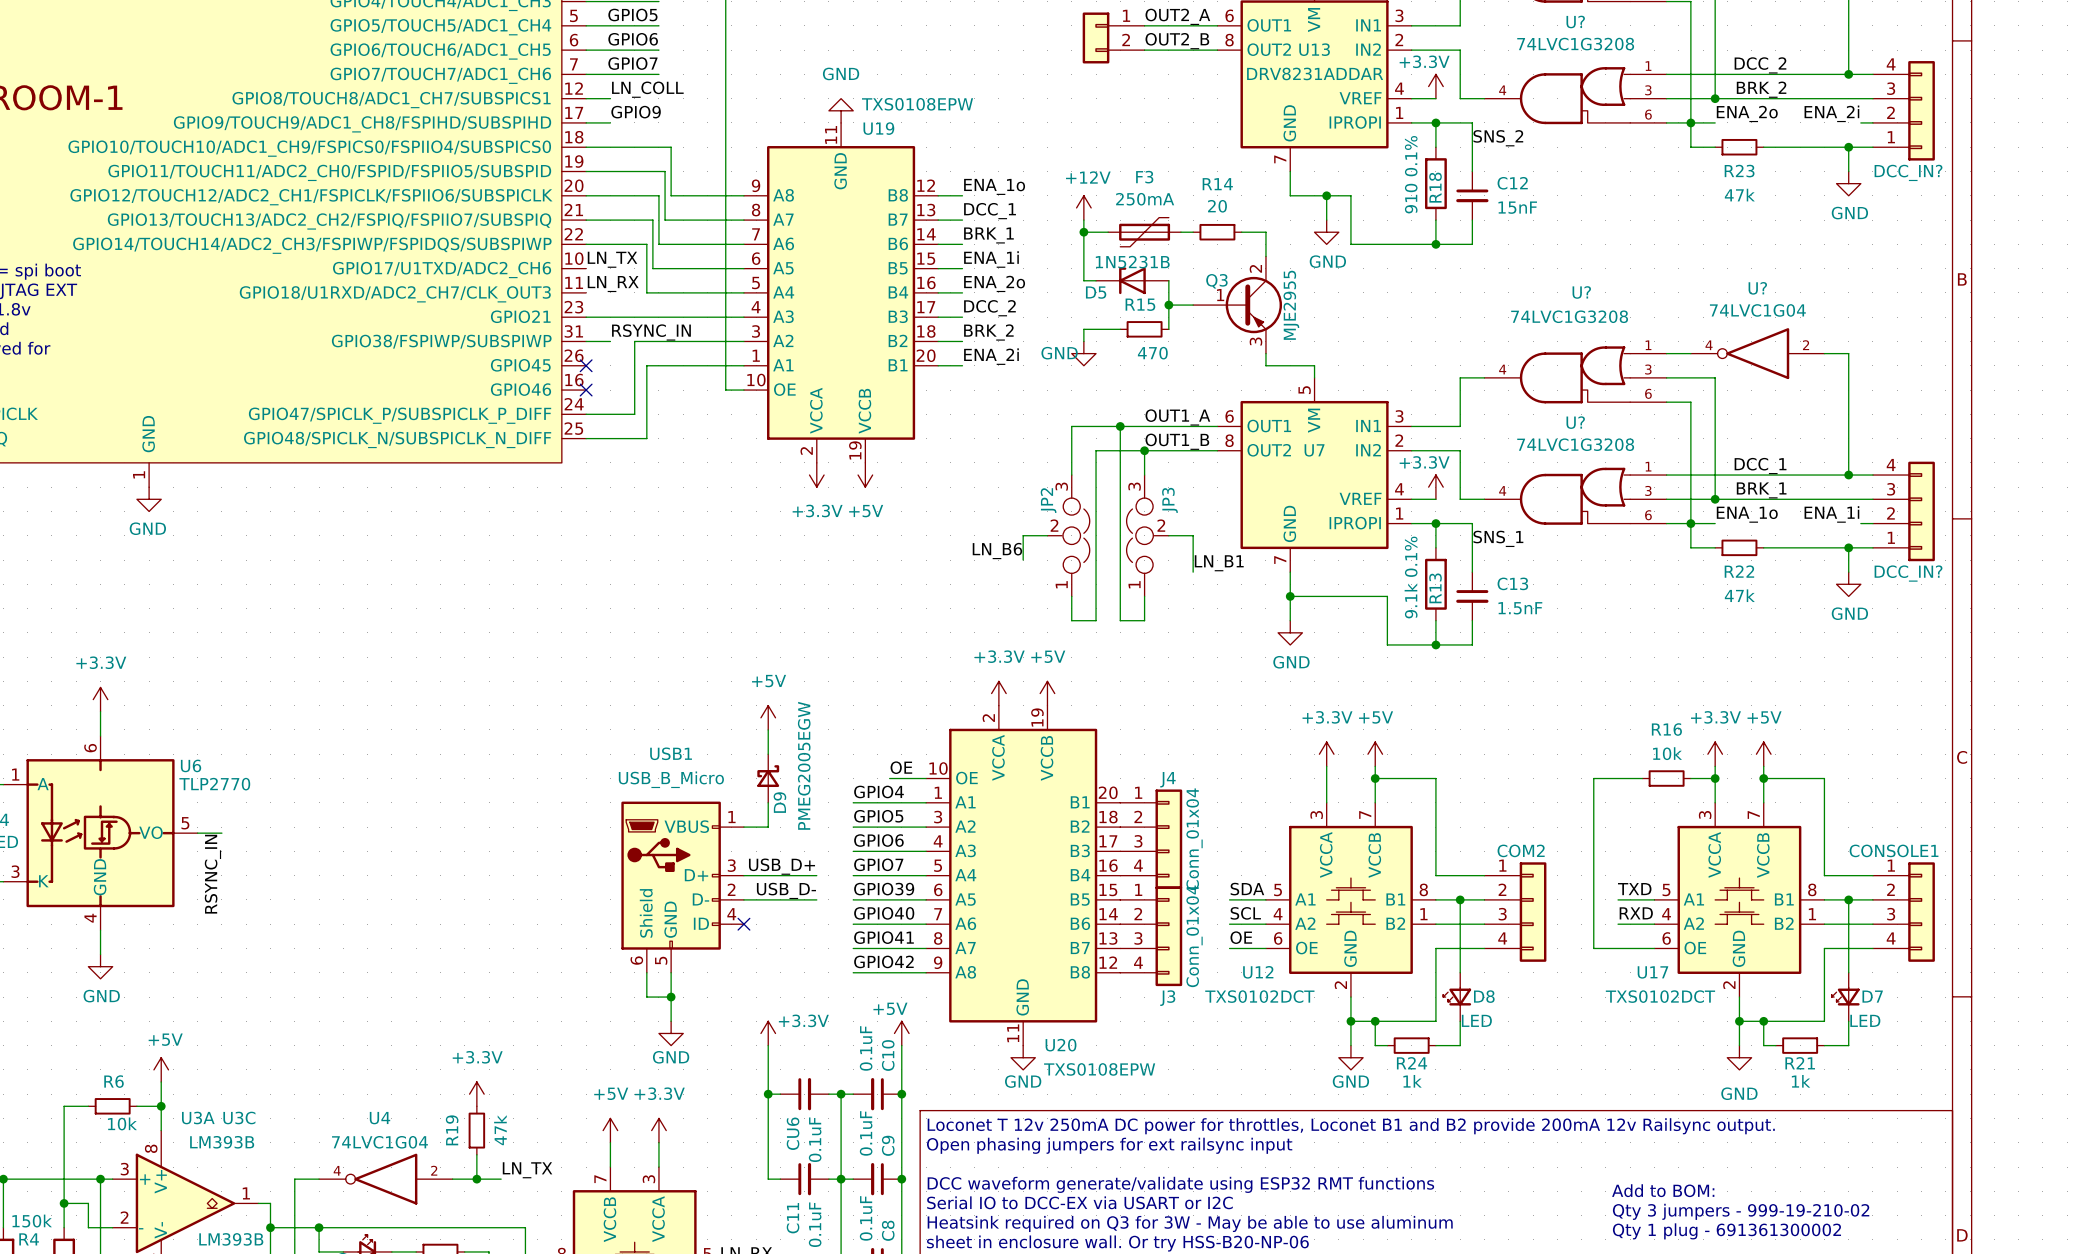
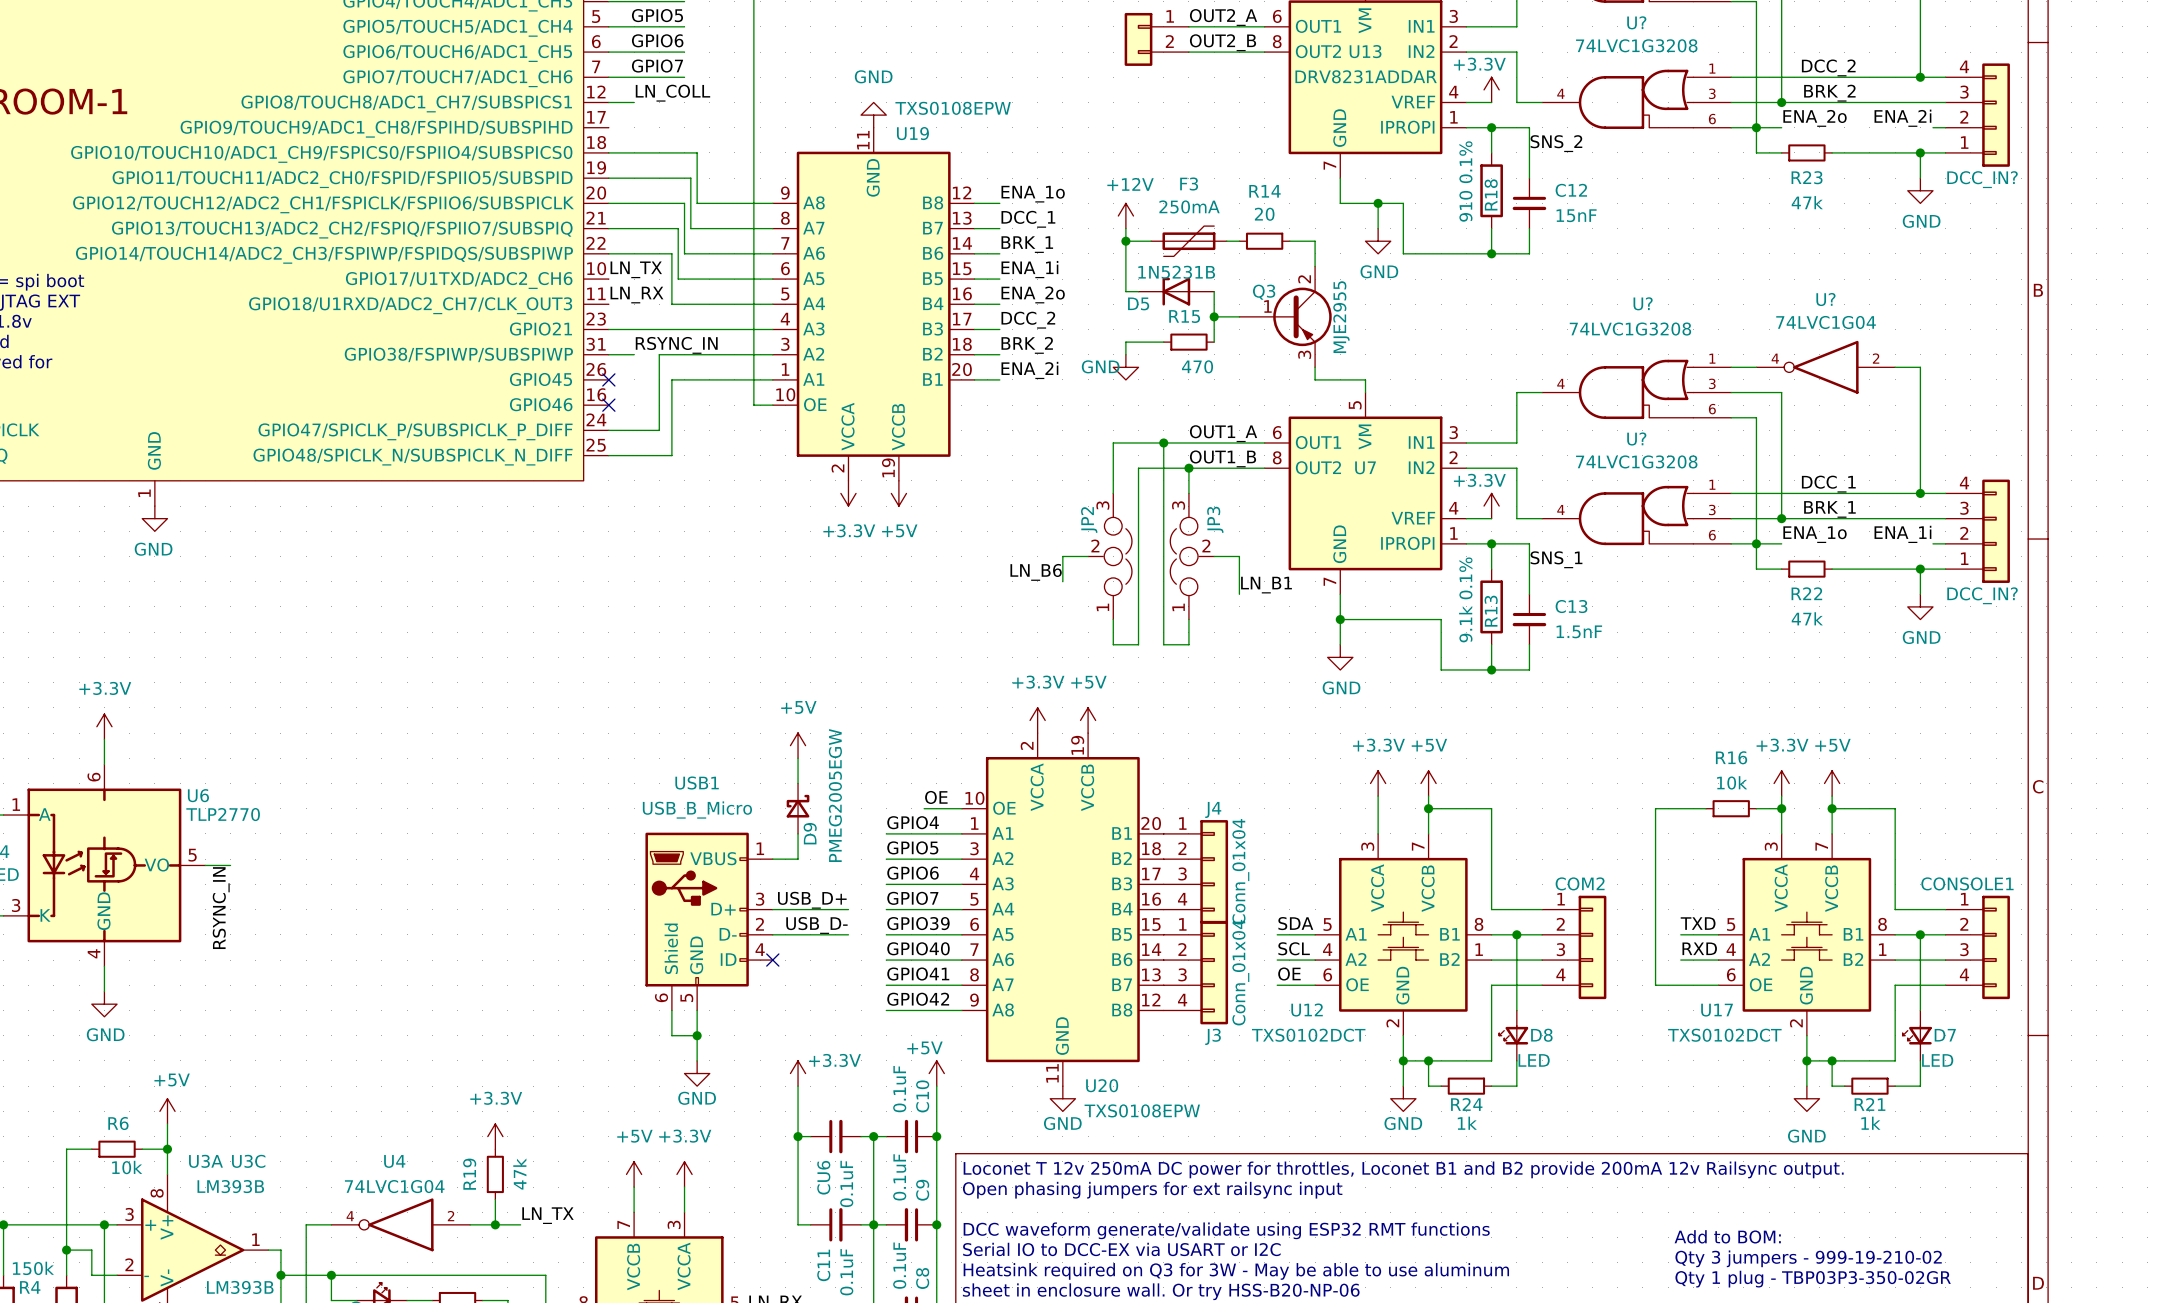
label: GPIO9 (636, 112) -> none
wire: (586, 122) (610, 122) -> none
text: Qty 1 plug - 691361300002 (1726, 1231) -> Qty 1 plug - TBP03P3-350-02GR (1813, 1279)

